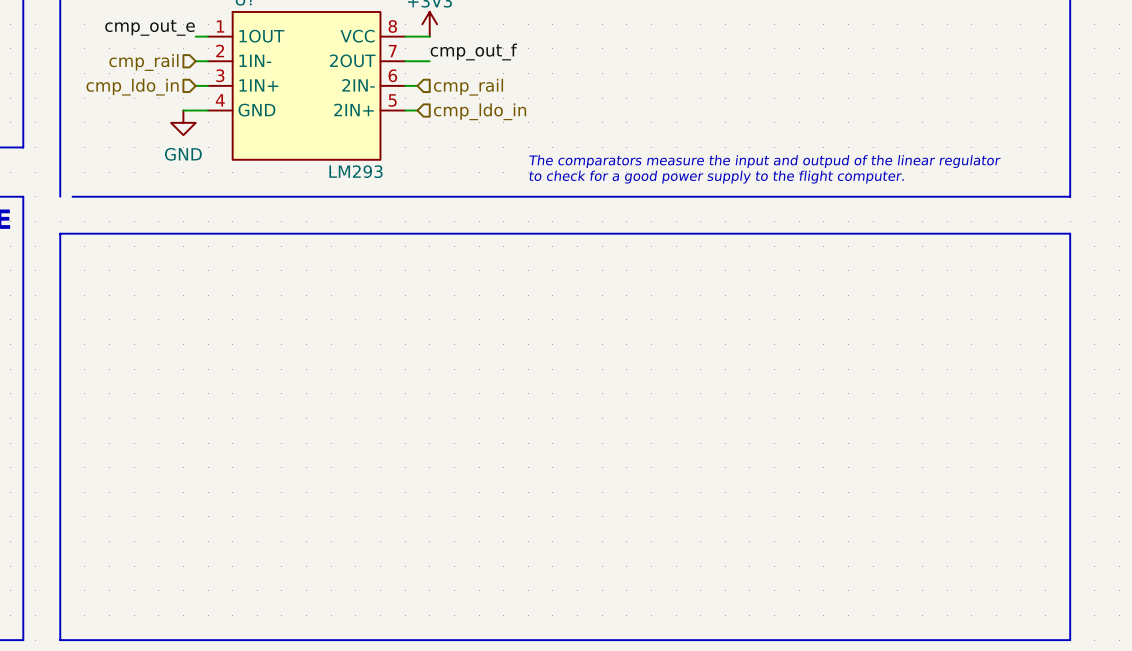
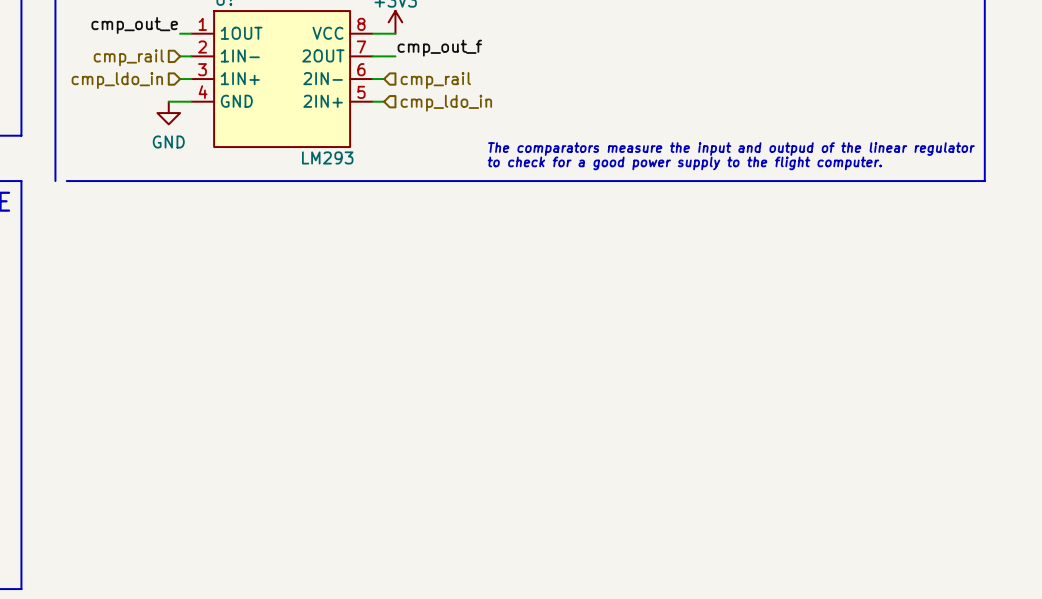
line: (60, 233) (1070, 233) (1070, 640) (60, 640) (60, 233) -> none

